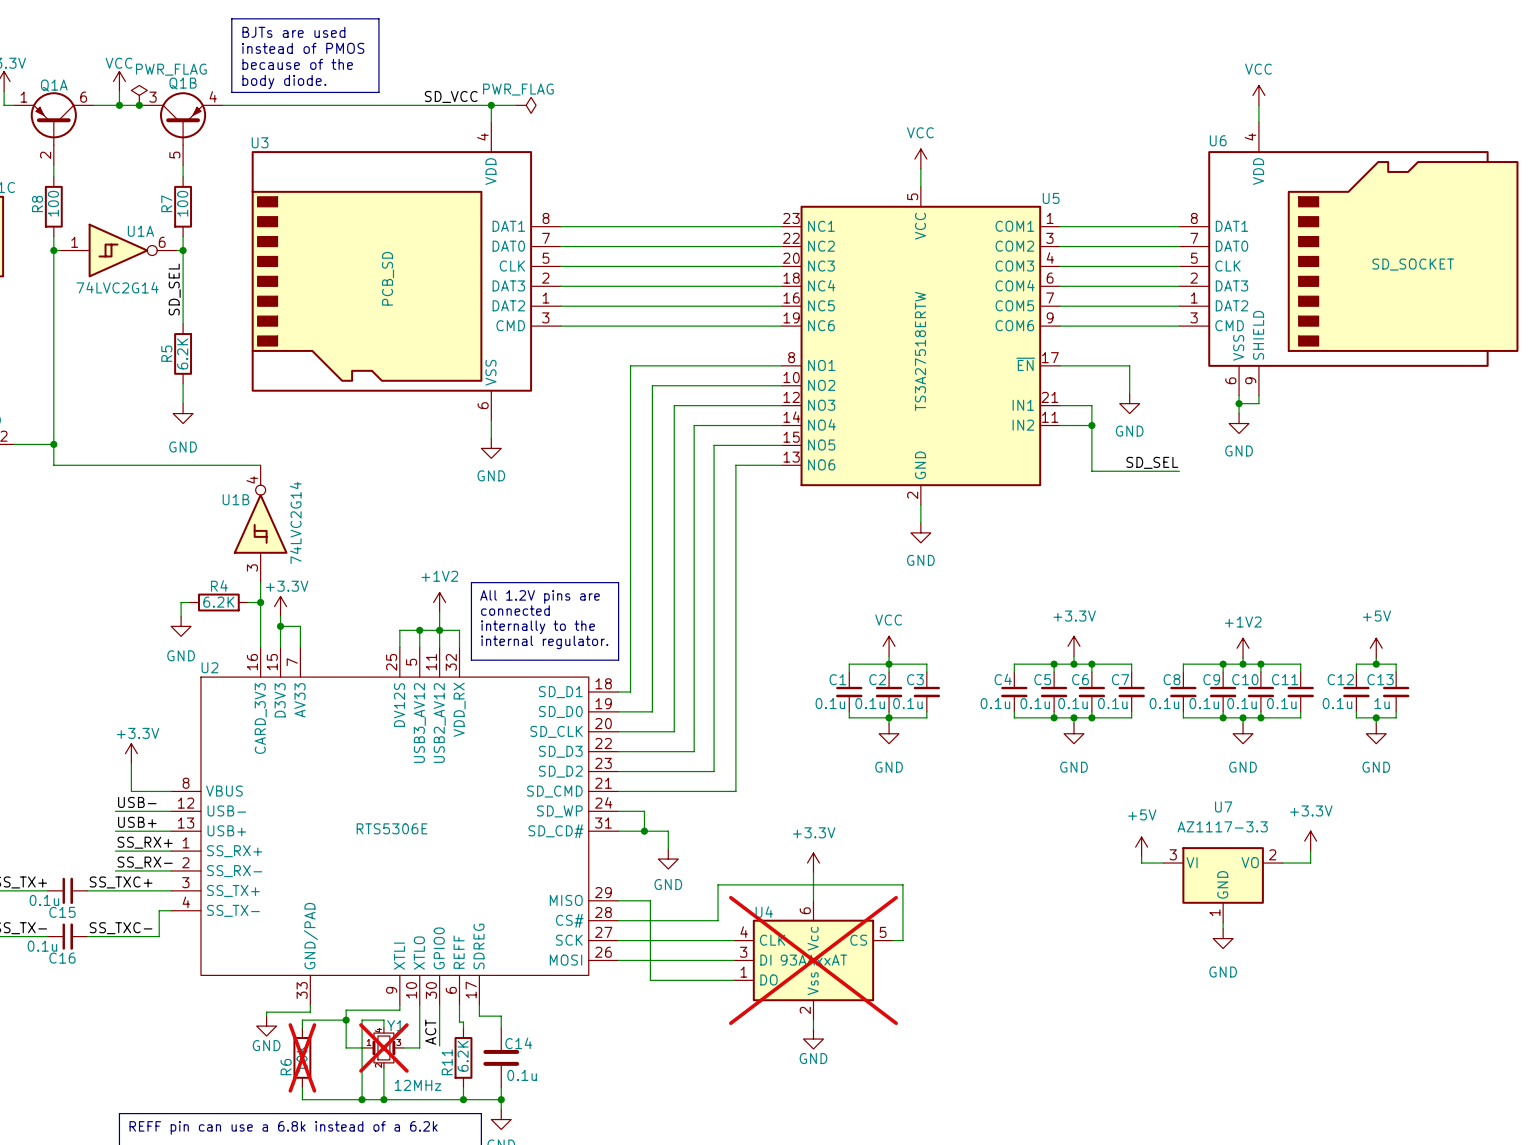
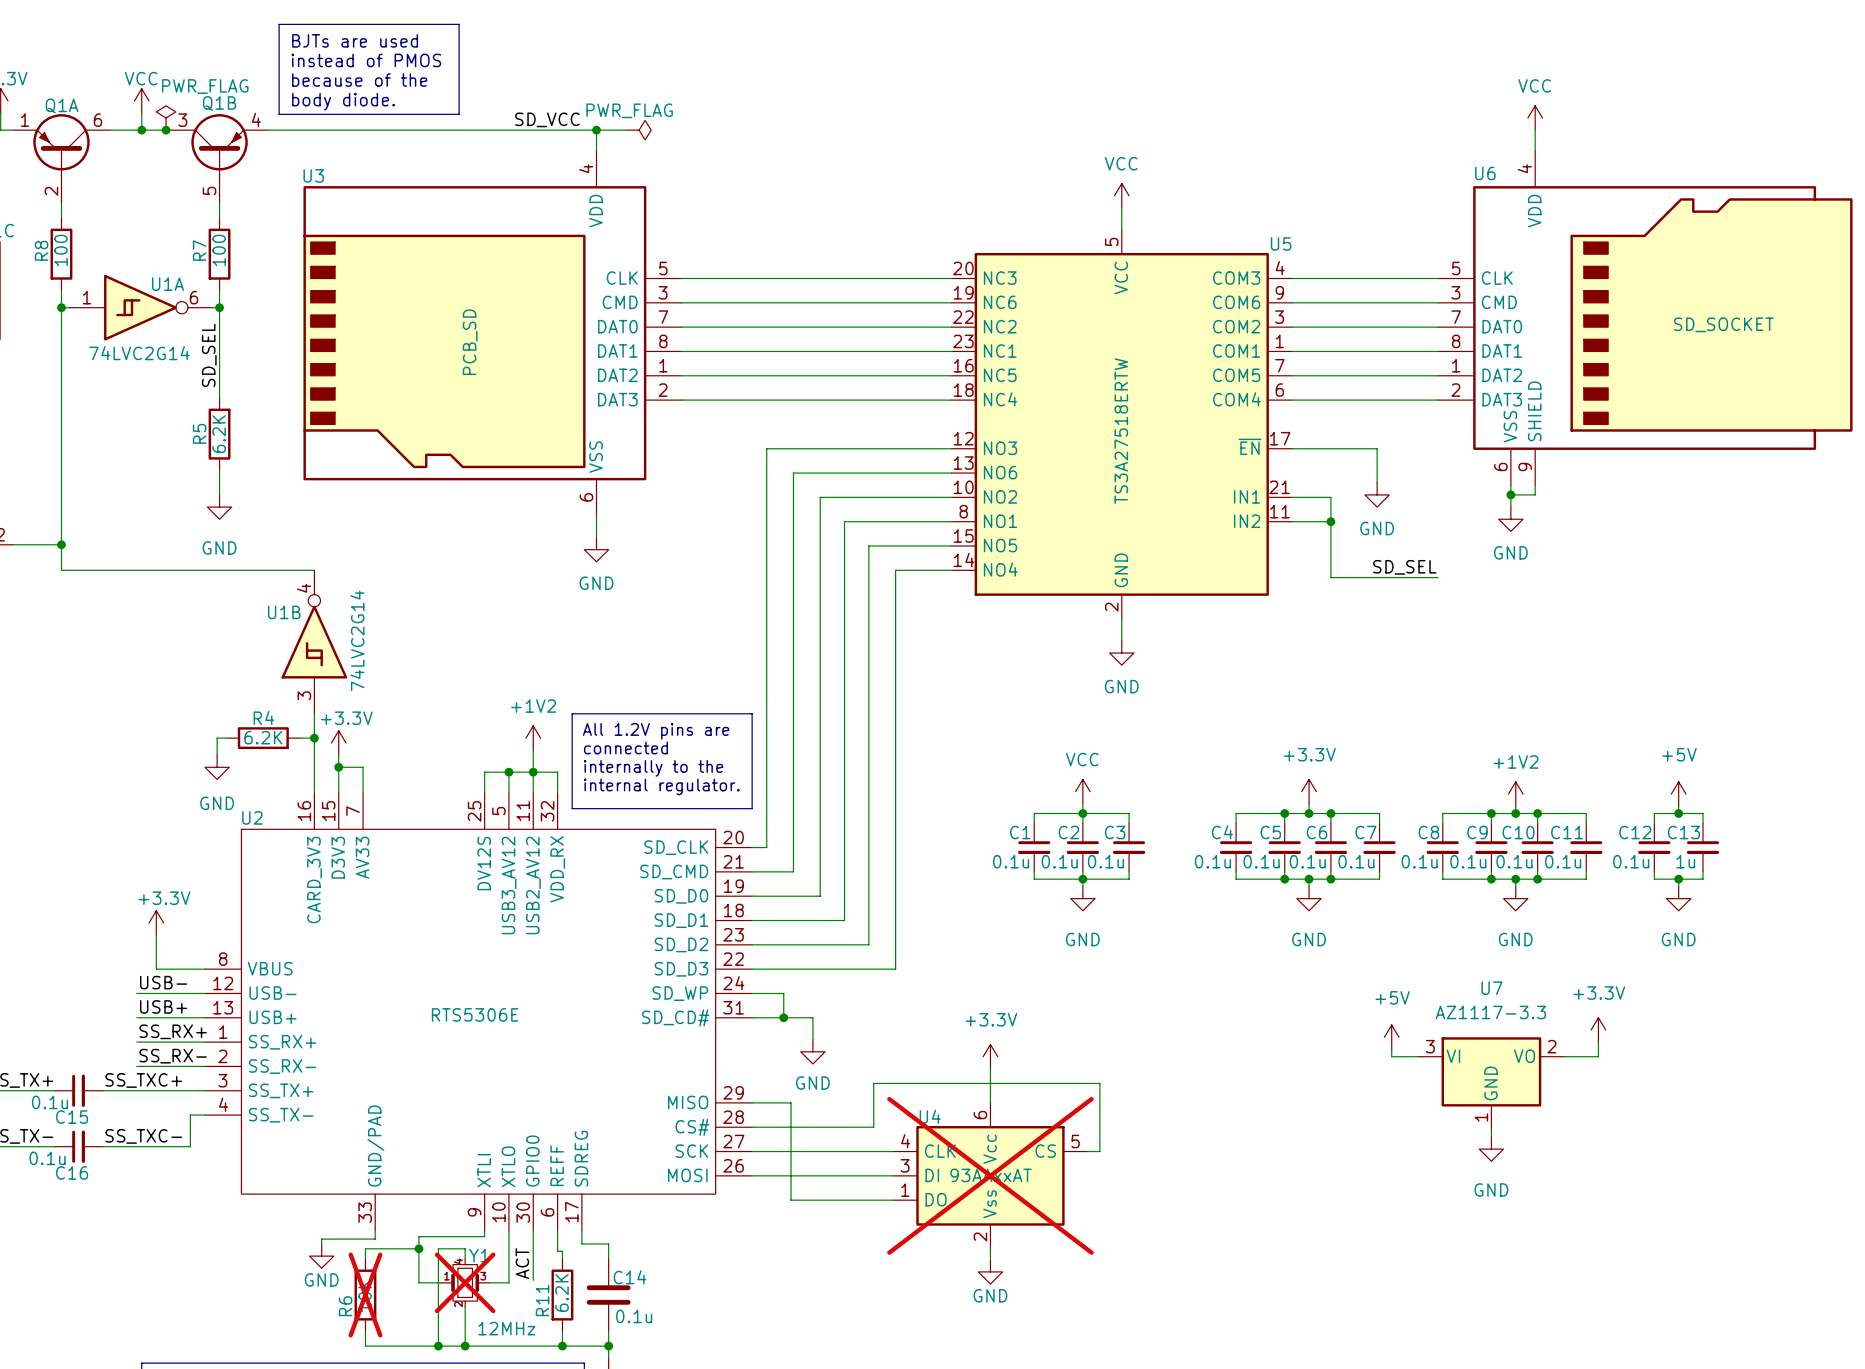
U3 symbol: [251, 122, 561, 421] -> [303, 150, 682, 516]
U6 symbol: [1179, 122, 1519, 396] -> [1437, 150, 1853, 486]
U5 symbol: [781, 186, 1061, 506] -> [951, 229, 1293, 619]
U2 symbol: [171, 647, 619, 1006] -> [204, 792, 753, 1231]

